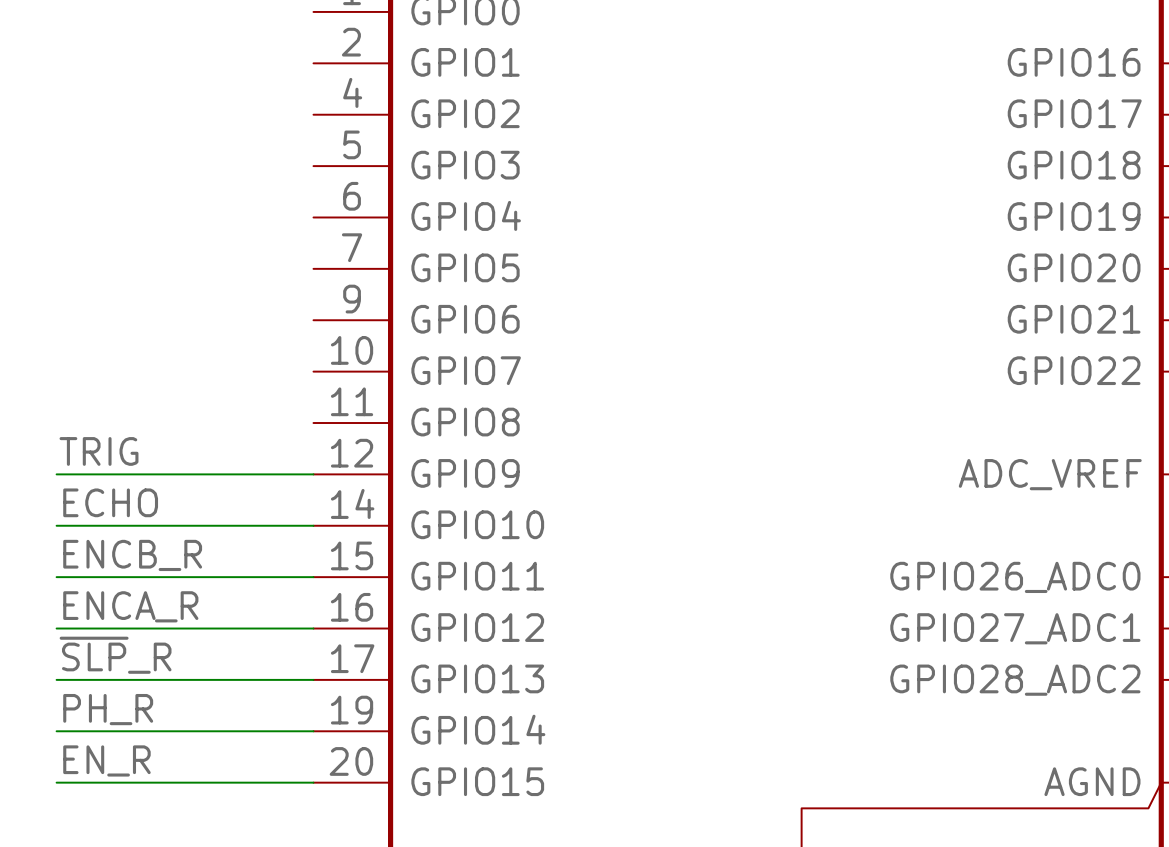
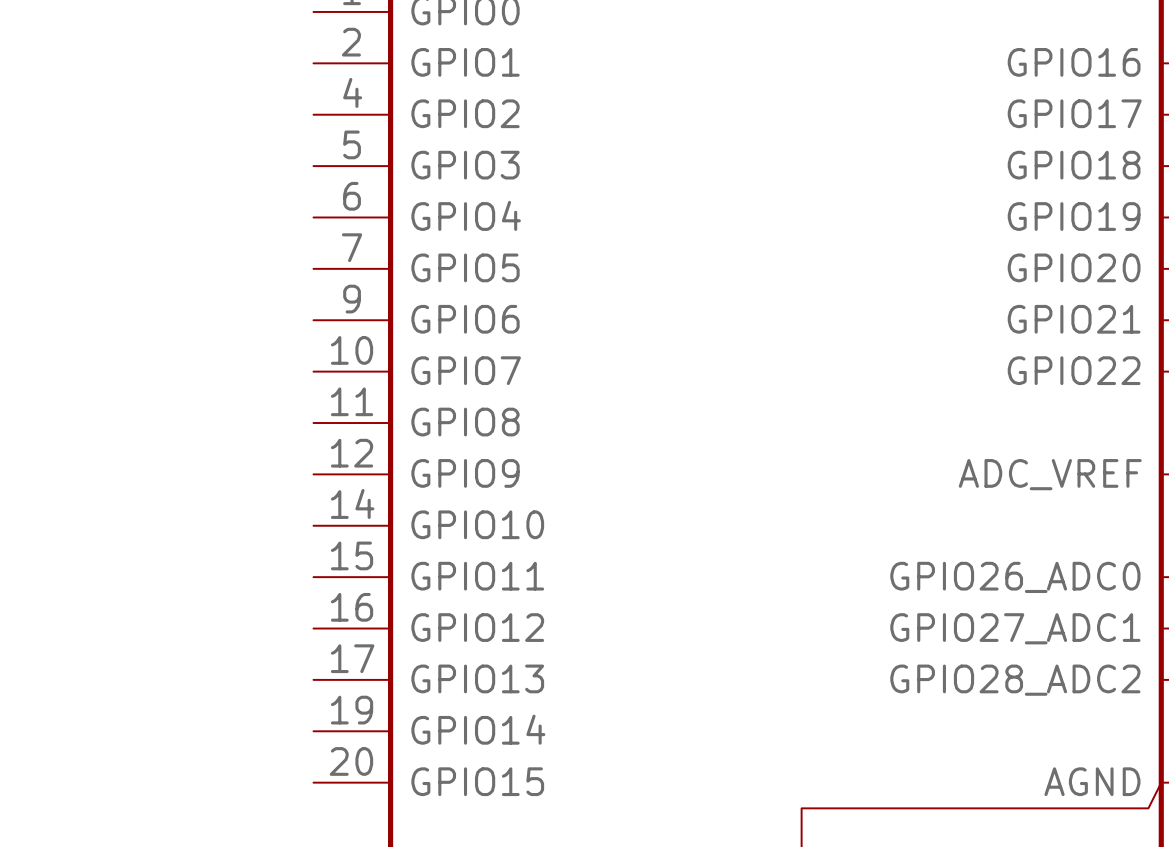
label: TRIG (99, 451) -> none
wire: (56, 474) (313, 474) -> none
label: ECHO (110, 502) -> none
wire: (56, 525) (313, 525) -> none
label: ENCB_R (132, 555) -> none
wire: (56, 577) (313, 577) -> none
label: ENCA_R (130, 606) -> none
wire: (56, 628) (313, 628) -> none
label: ~{SLP}_R (115, 655) -> none
wire: (56, 679) (313, 679) -> none
label: PH_R (108, 709) -> none
wire: (56, 731) (313, 731) -> none
label: EN_R (106, 760) -> none
wire: (56, 782) (313, 782) -> none

